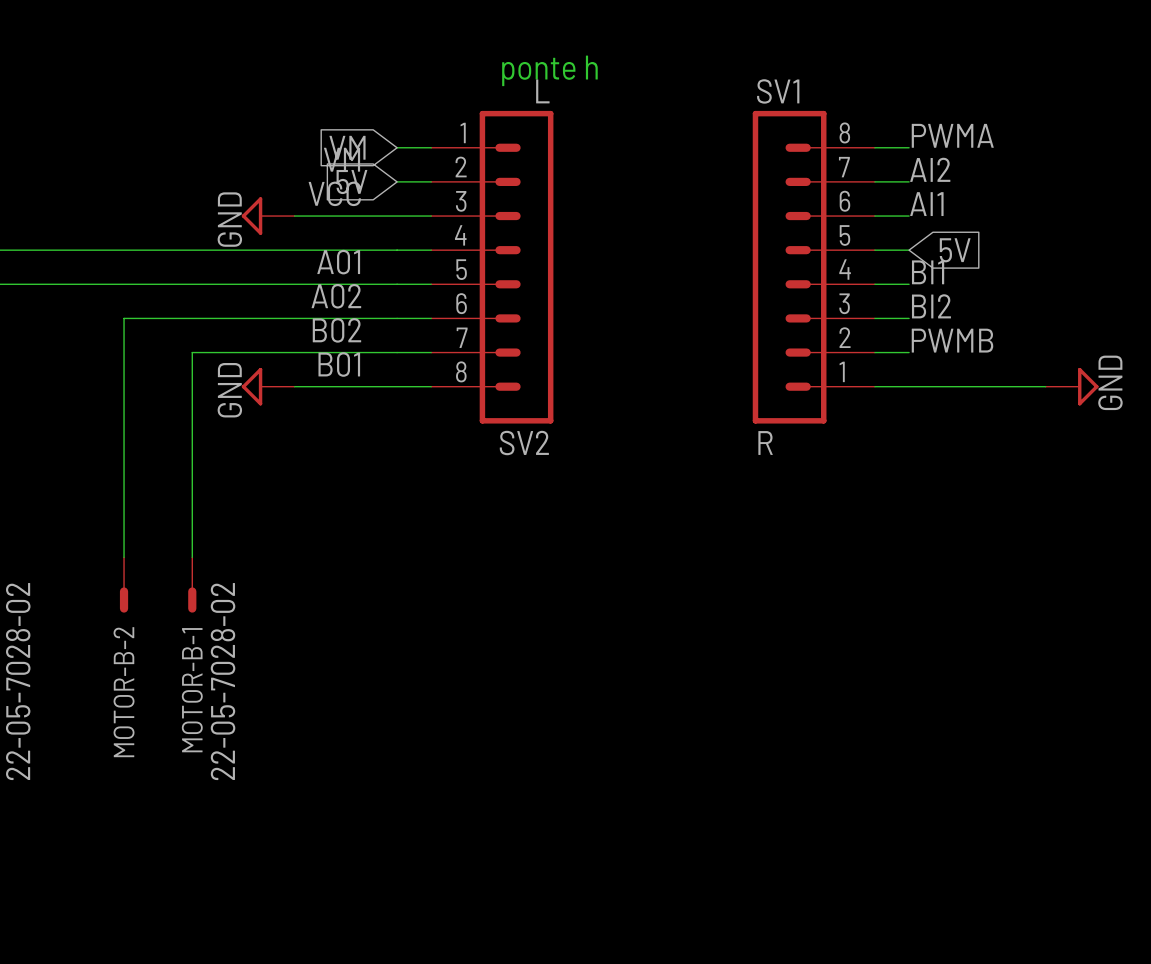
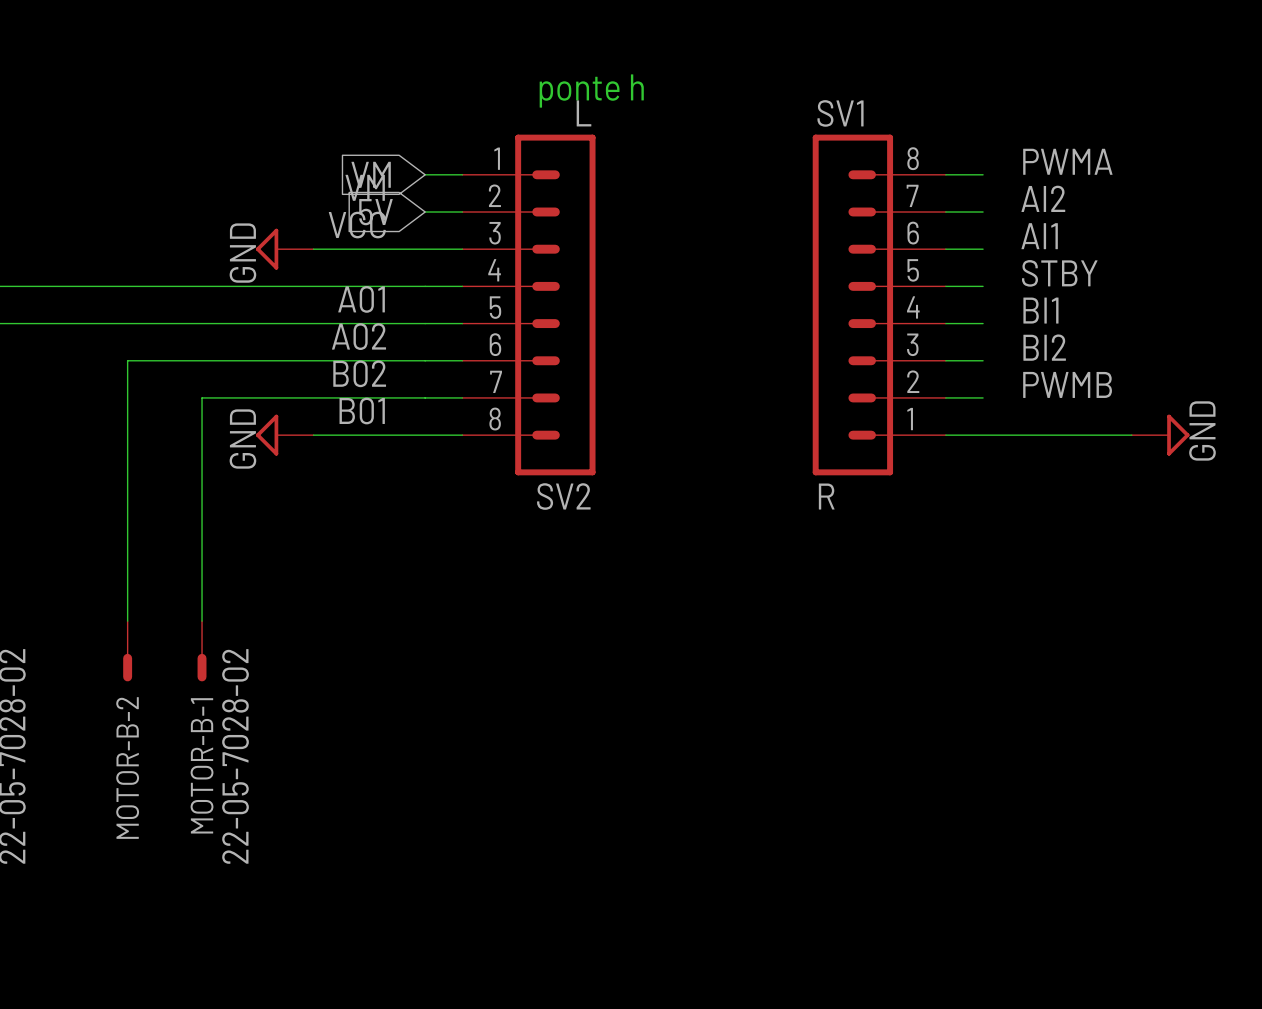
label position: PWMA (952, 135) -> PWMA (1067, 161)
label position: AI2 (930, 169) -> AI2 (1043, 198)
label position: AI1 (926, 204) -> AI1 (1039, 236)
label: none -> STBY (1059, 273)
global label: 5V (955, 250) -> none
label position: BI1 (928, 272) -> BI1 (1040, 310)
label position: BI2 (931, 306) -> BI2 (1044, 347)
label position: PWMB (952, 340) -> PWMB (1067, 384)

